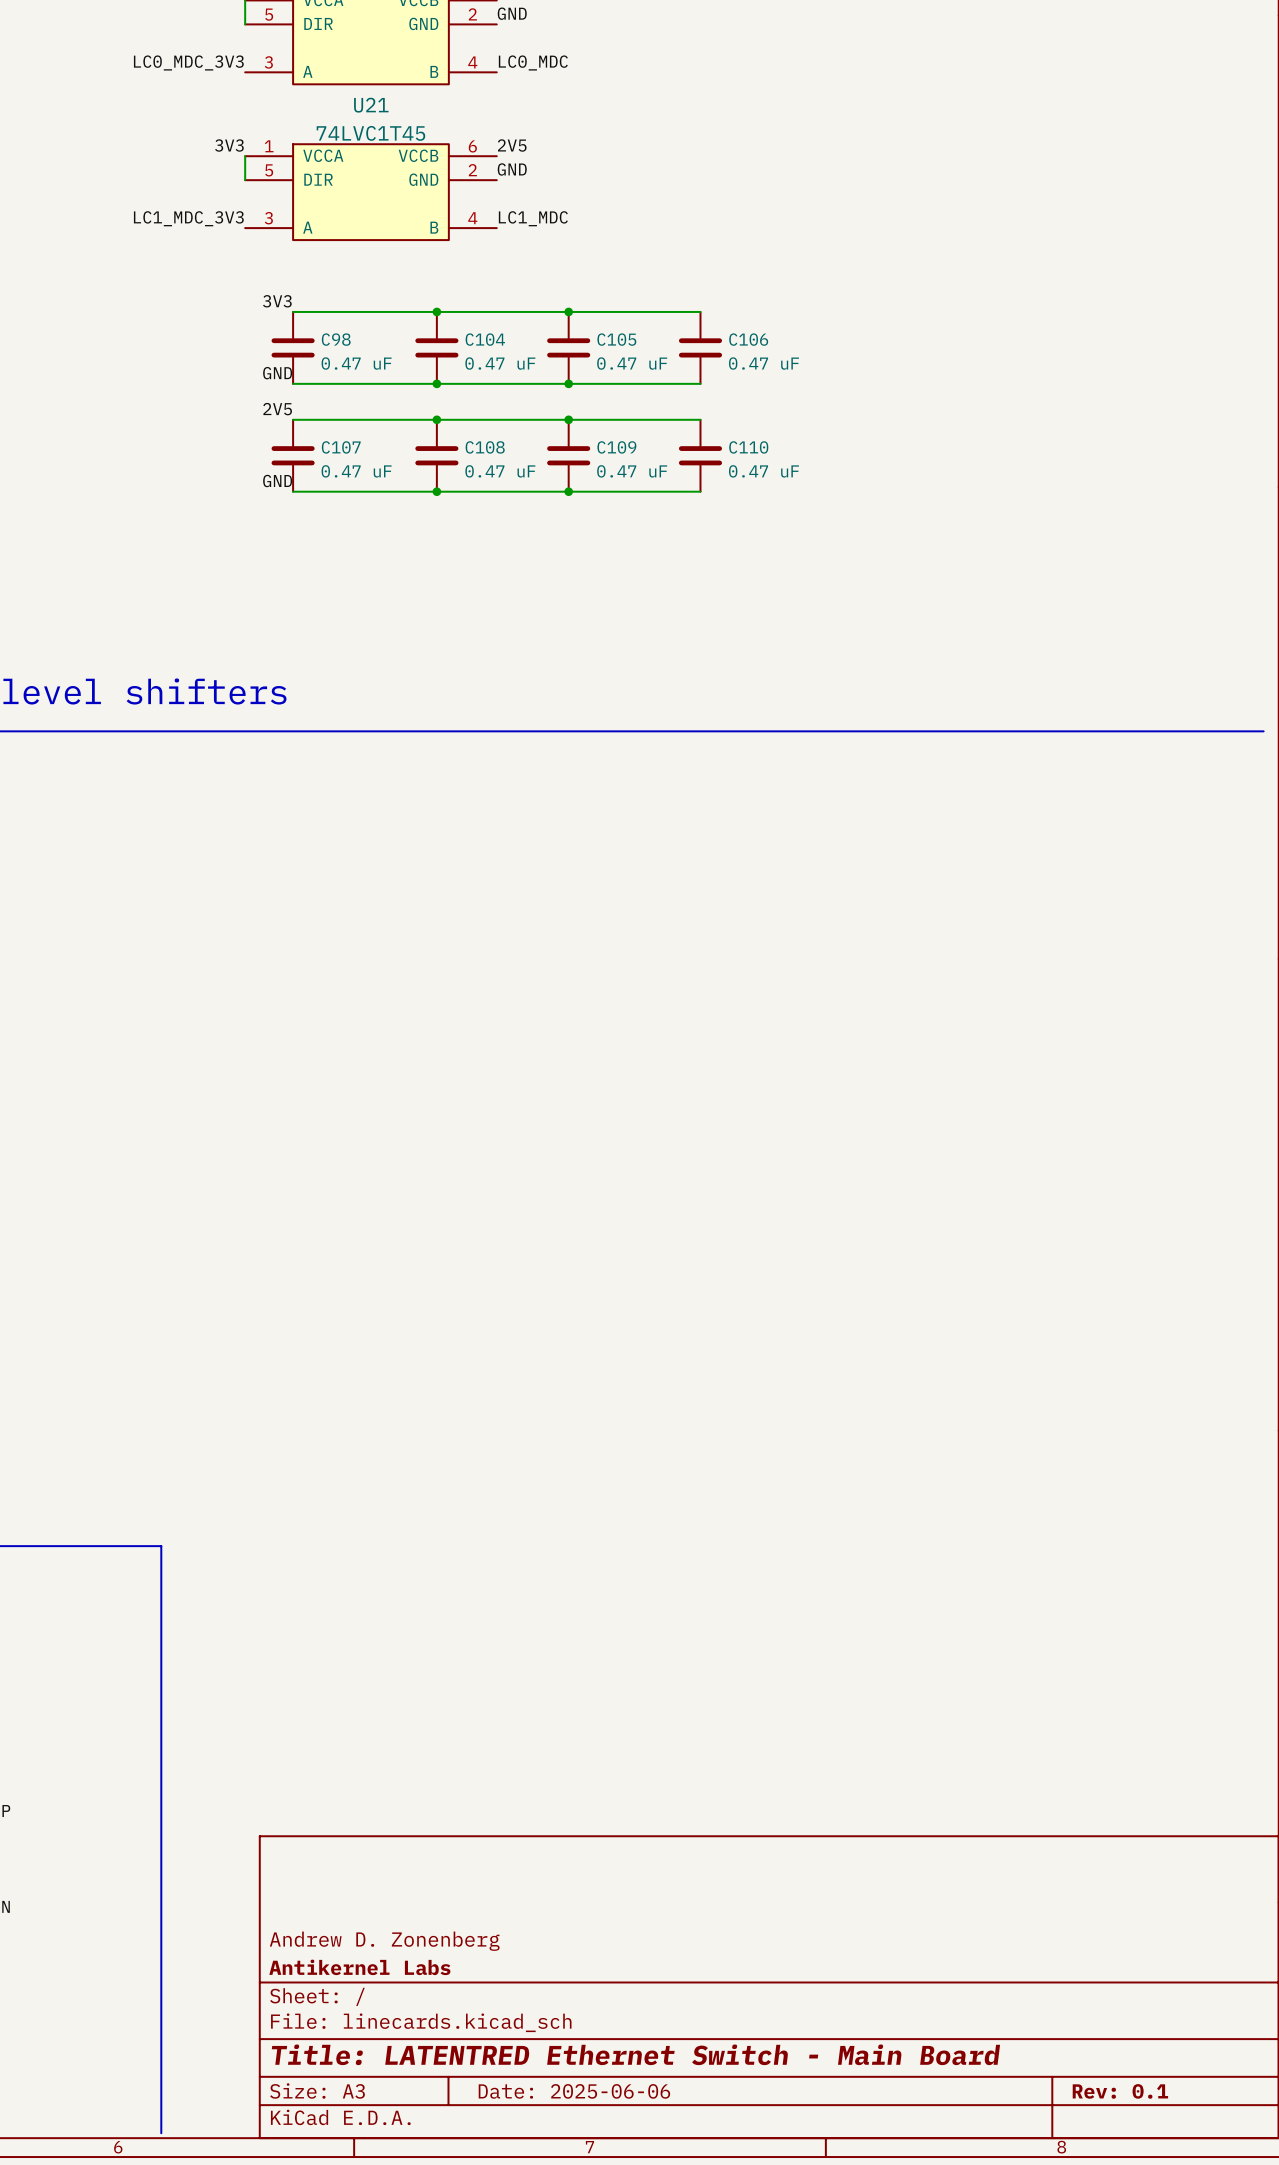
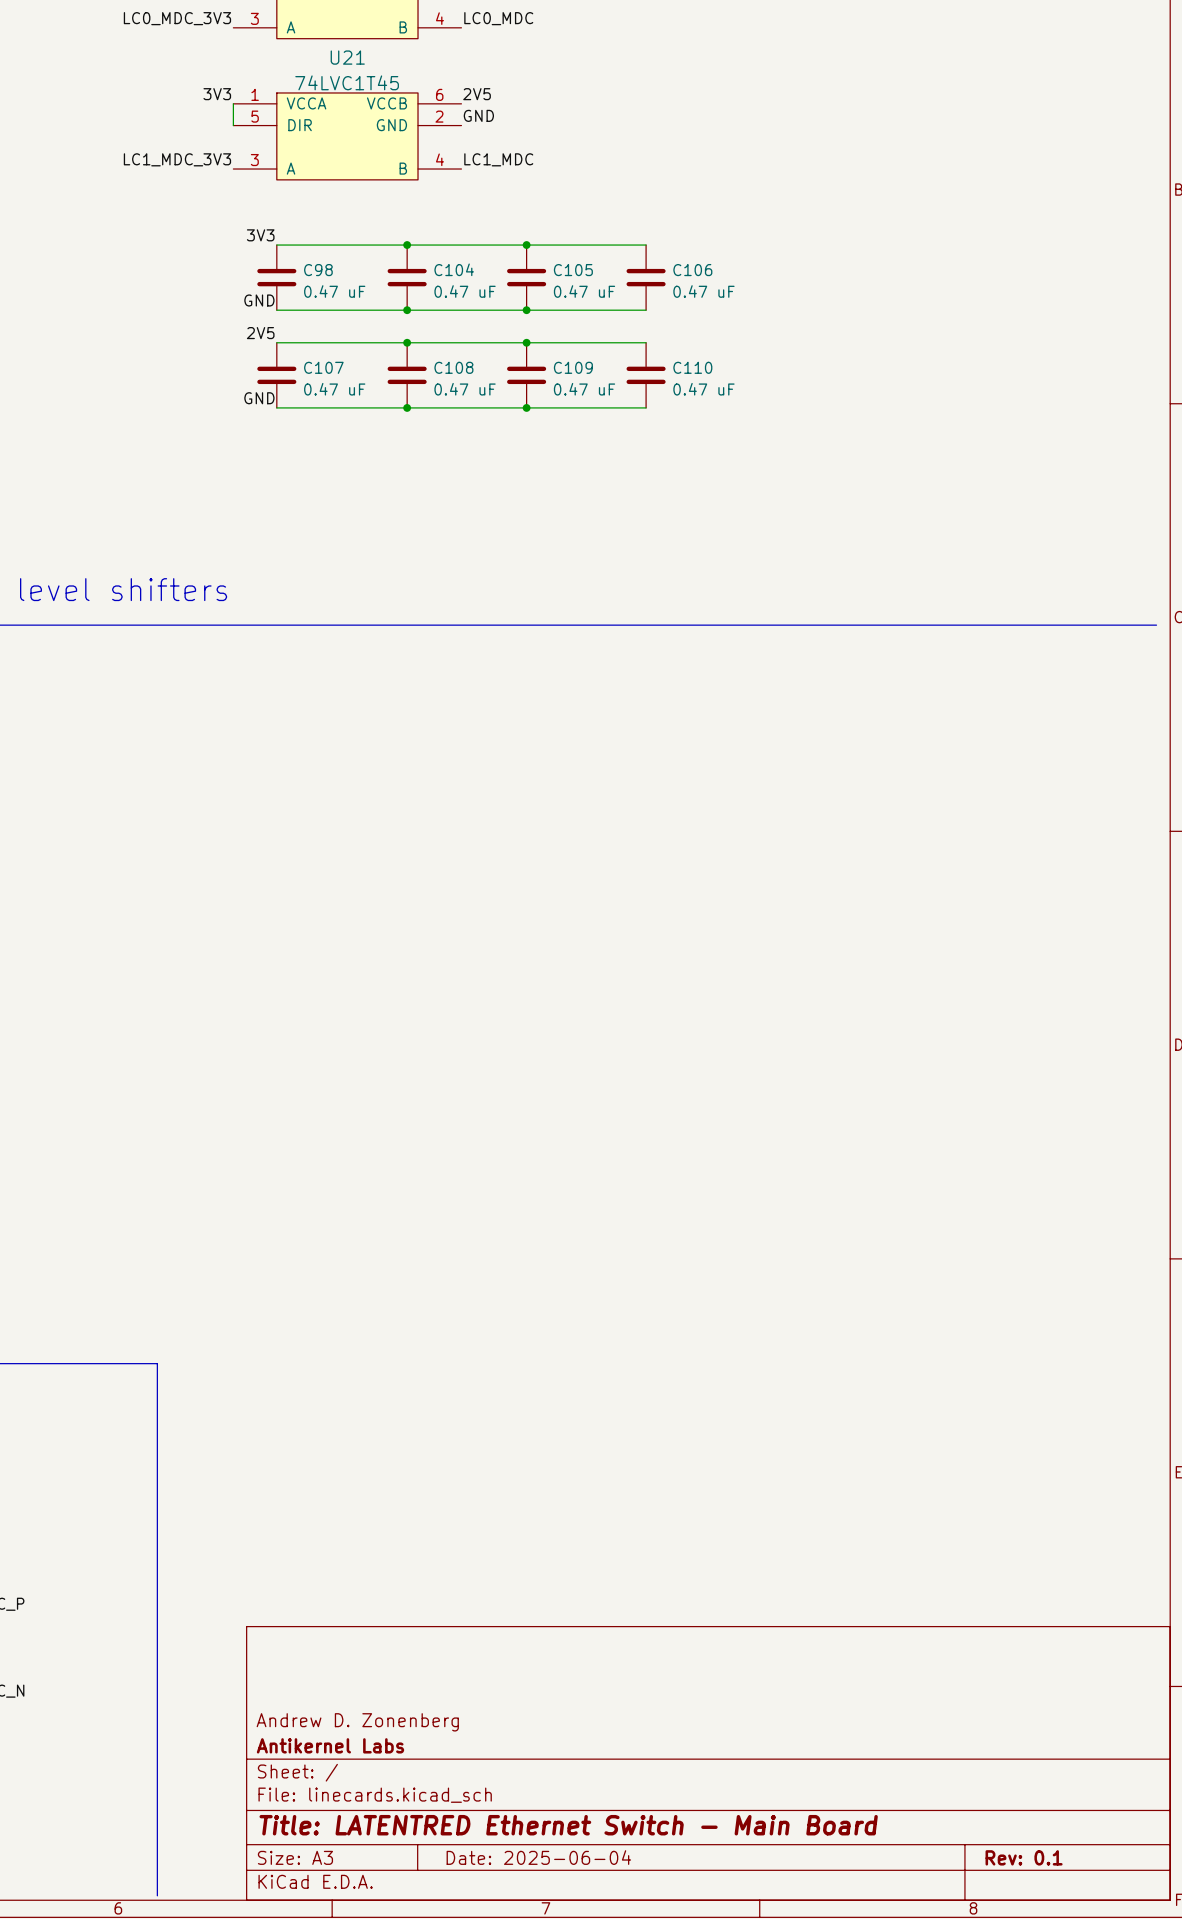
title block: Date: 2025-06-06 (574, 2091) -> Date: 2025-06-04 (538, 1857)

